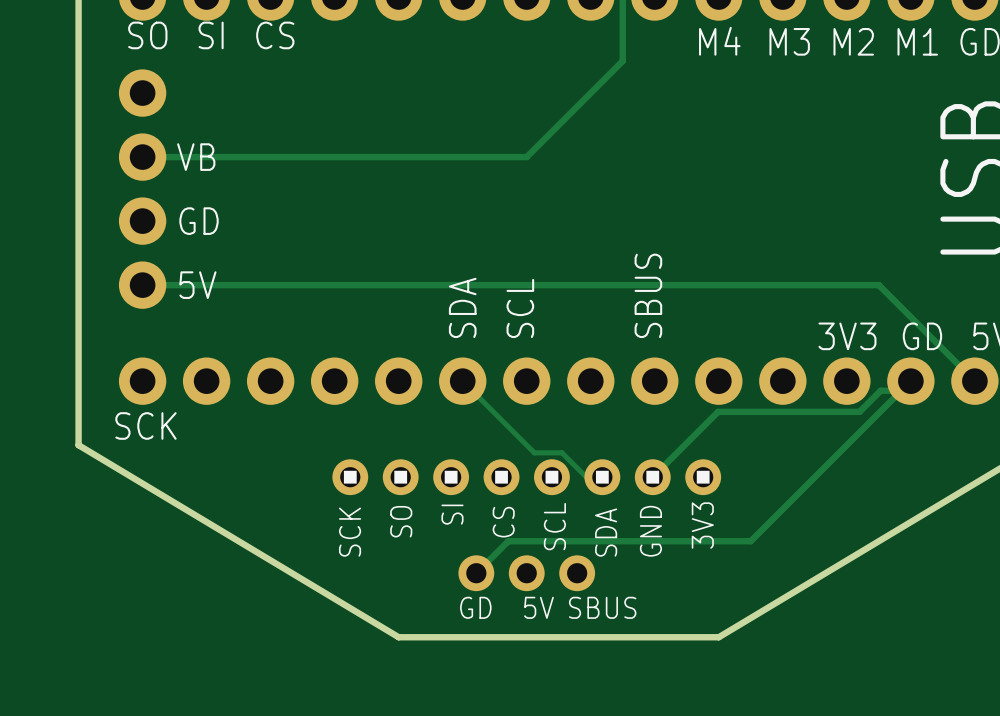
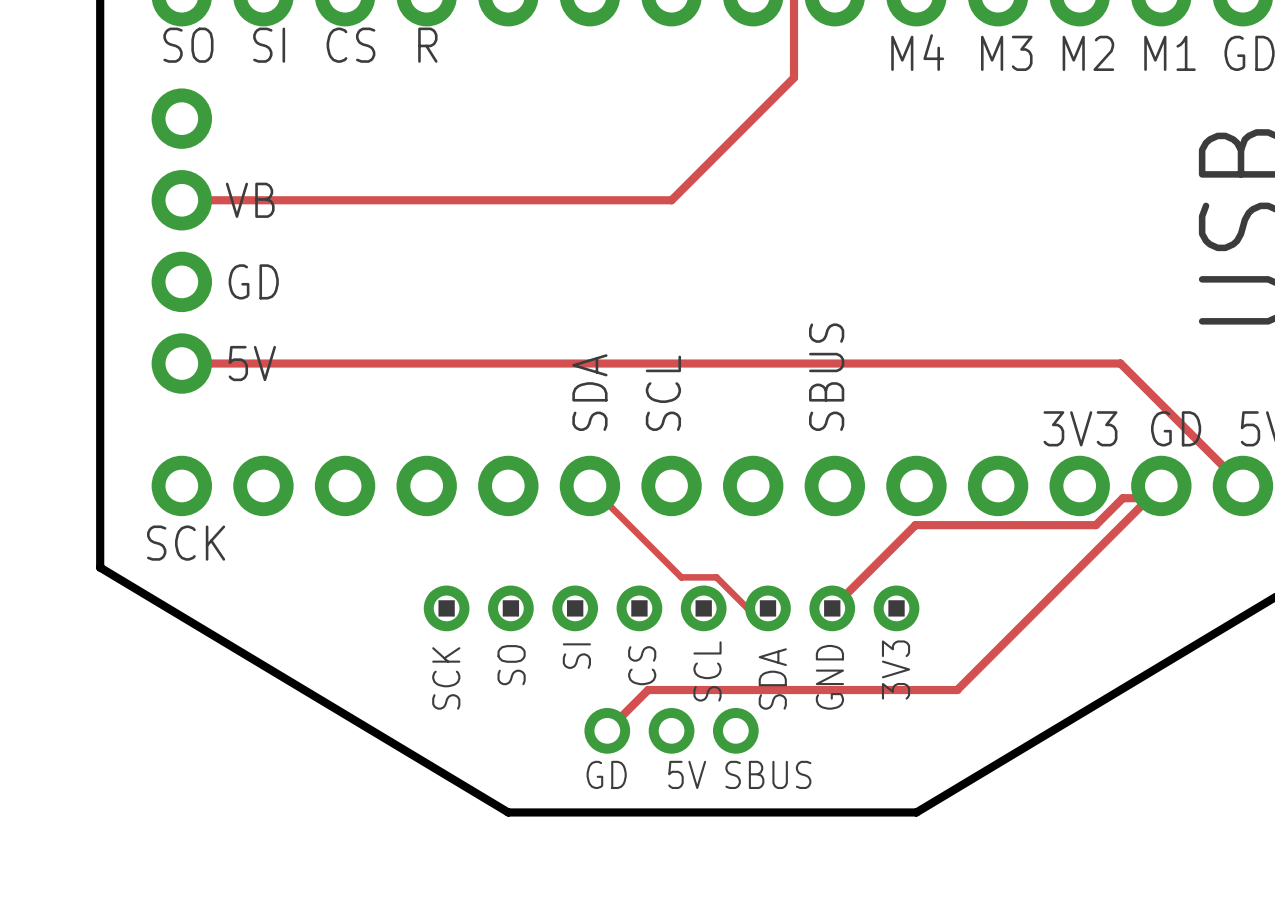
text: none -> R (427, 45)

